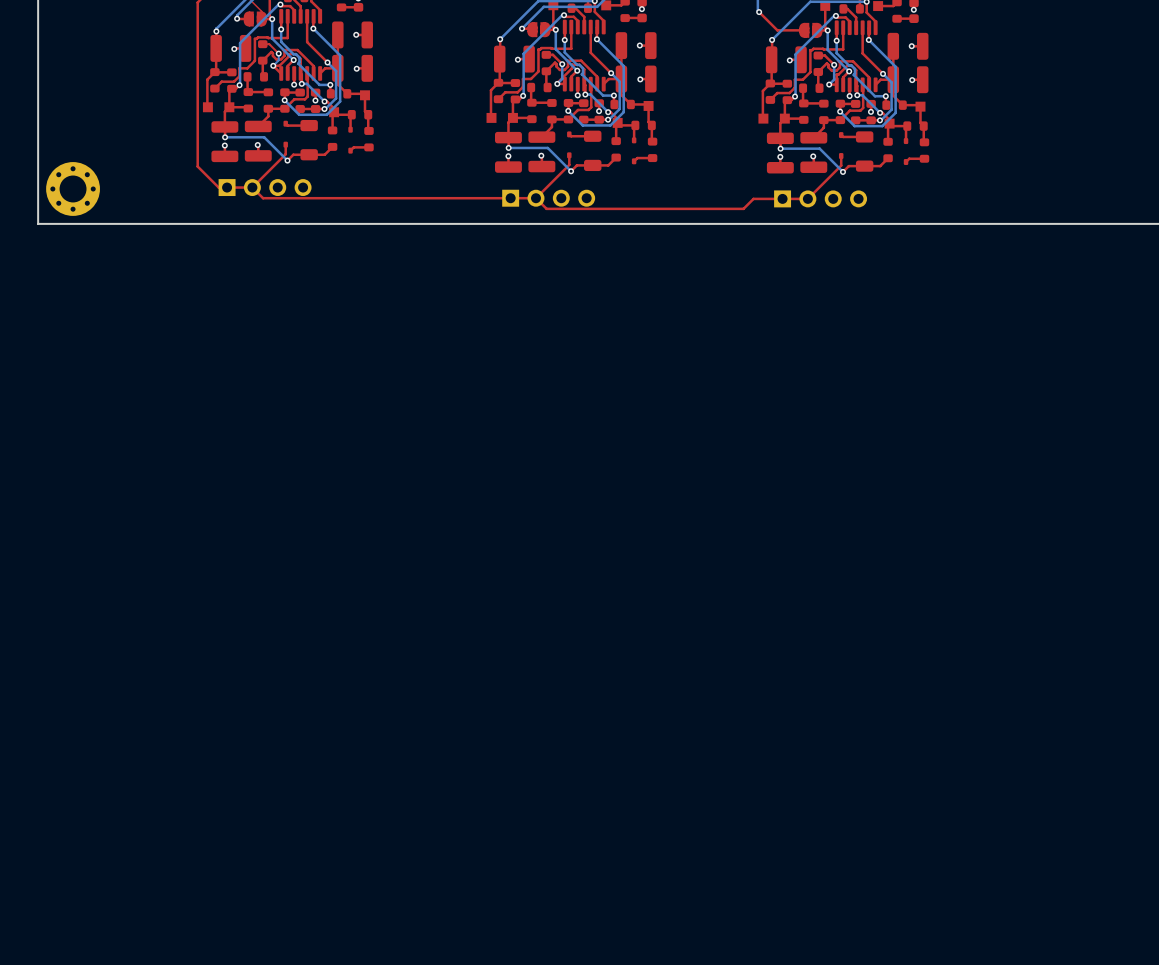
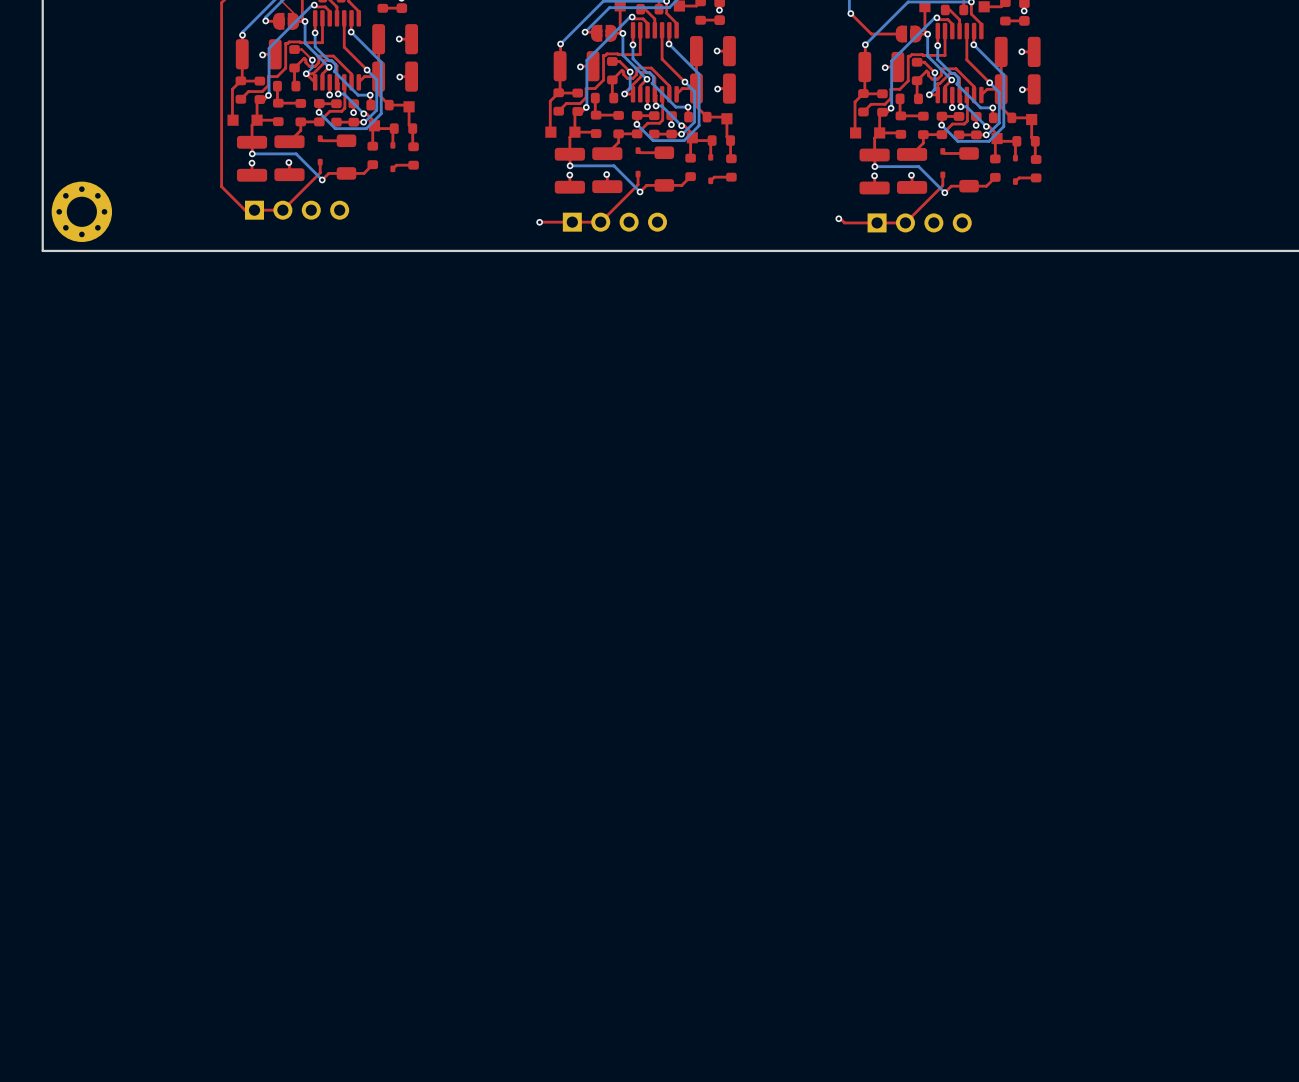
top track: (252, 187) (263, 198) (481, 198) -> none
via: none -> (838, 218)
via: none -> (539, 222)
top track: (535, 198) (546, 208) (743, 208) (753, 198) -> (838, 218) (844, 222)

